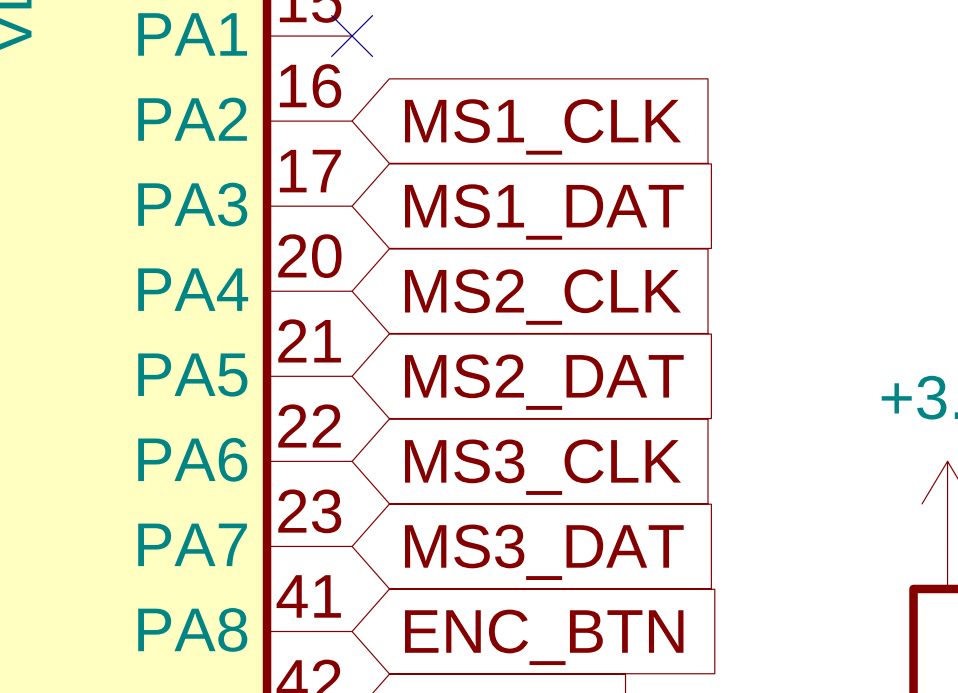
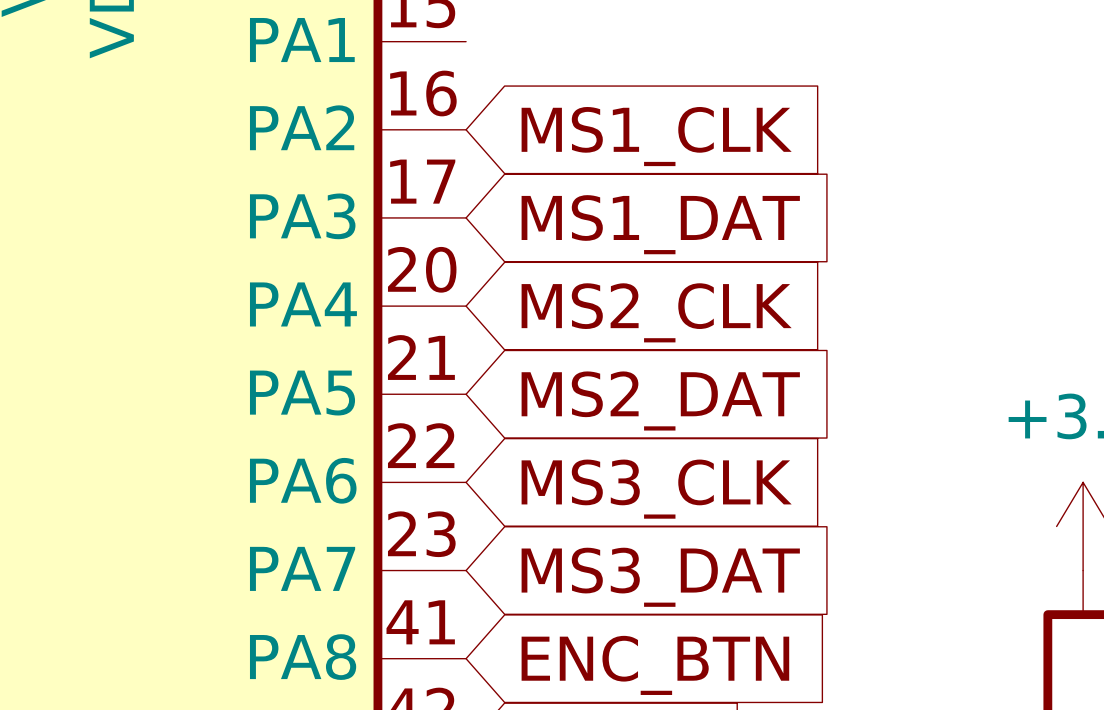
no-connect mark: (352, 36) -> none

